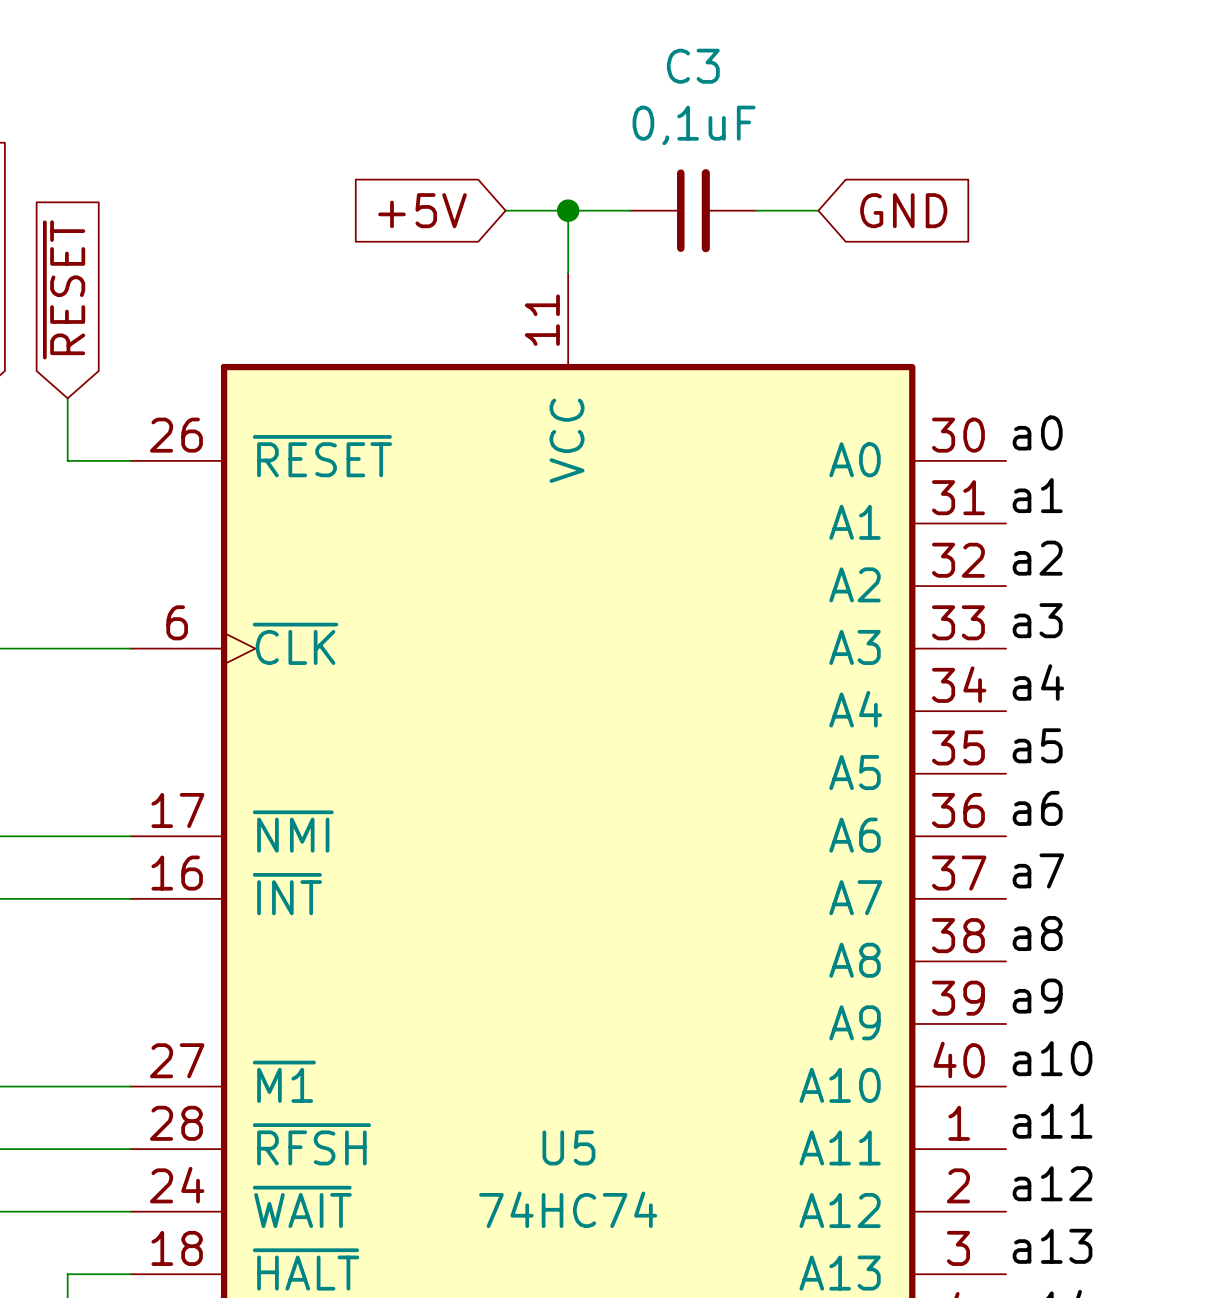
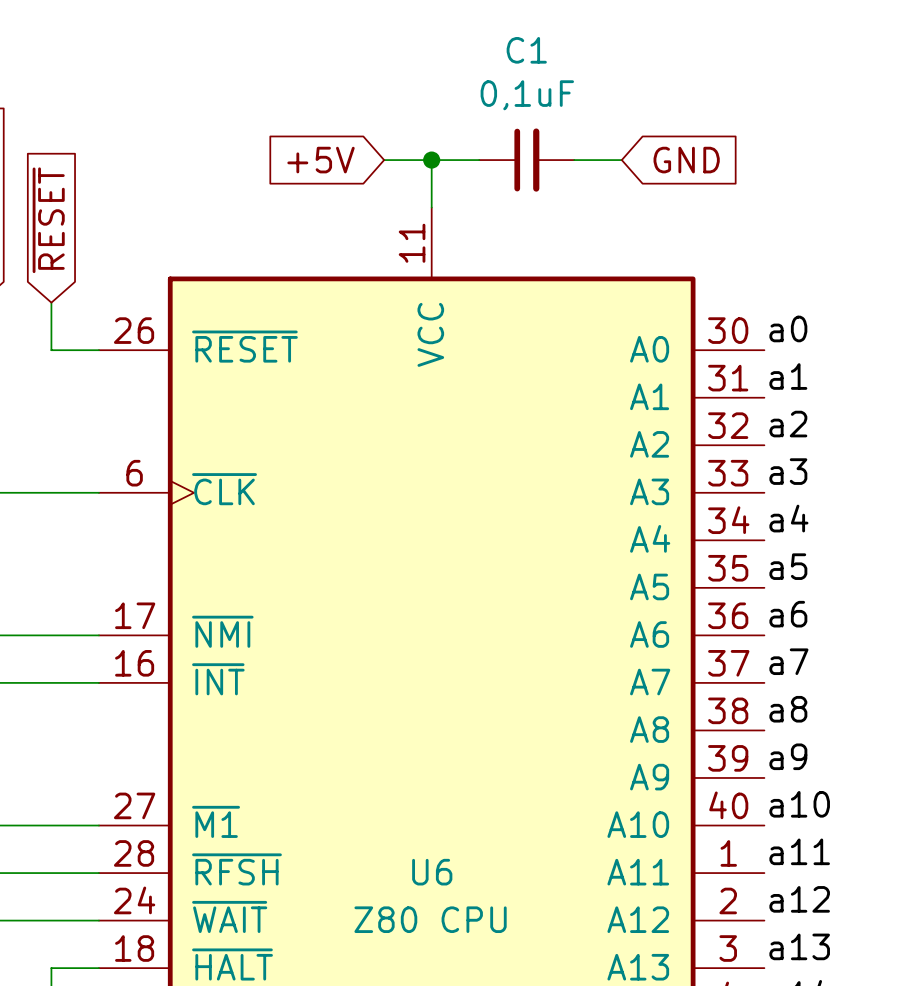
C3 name: C3 (693, 66) -> C1 (526, 50)
U5 name: U5 (568, 1147) -> U6 (432, 872)
U5 value: 74HC74 (568, 1209) -> Z80 CPU (430, 919)

